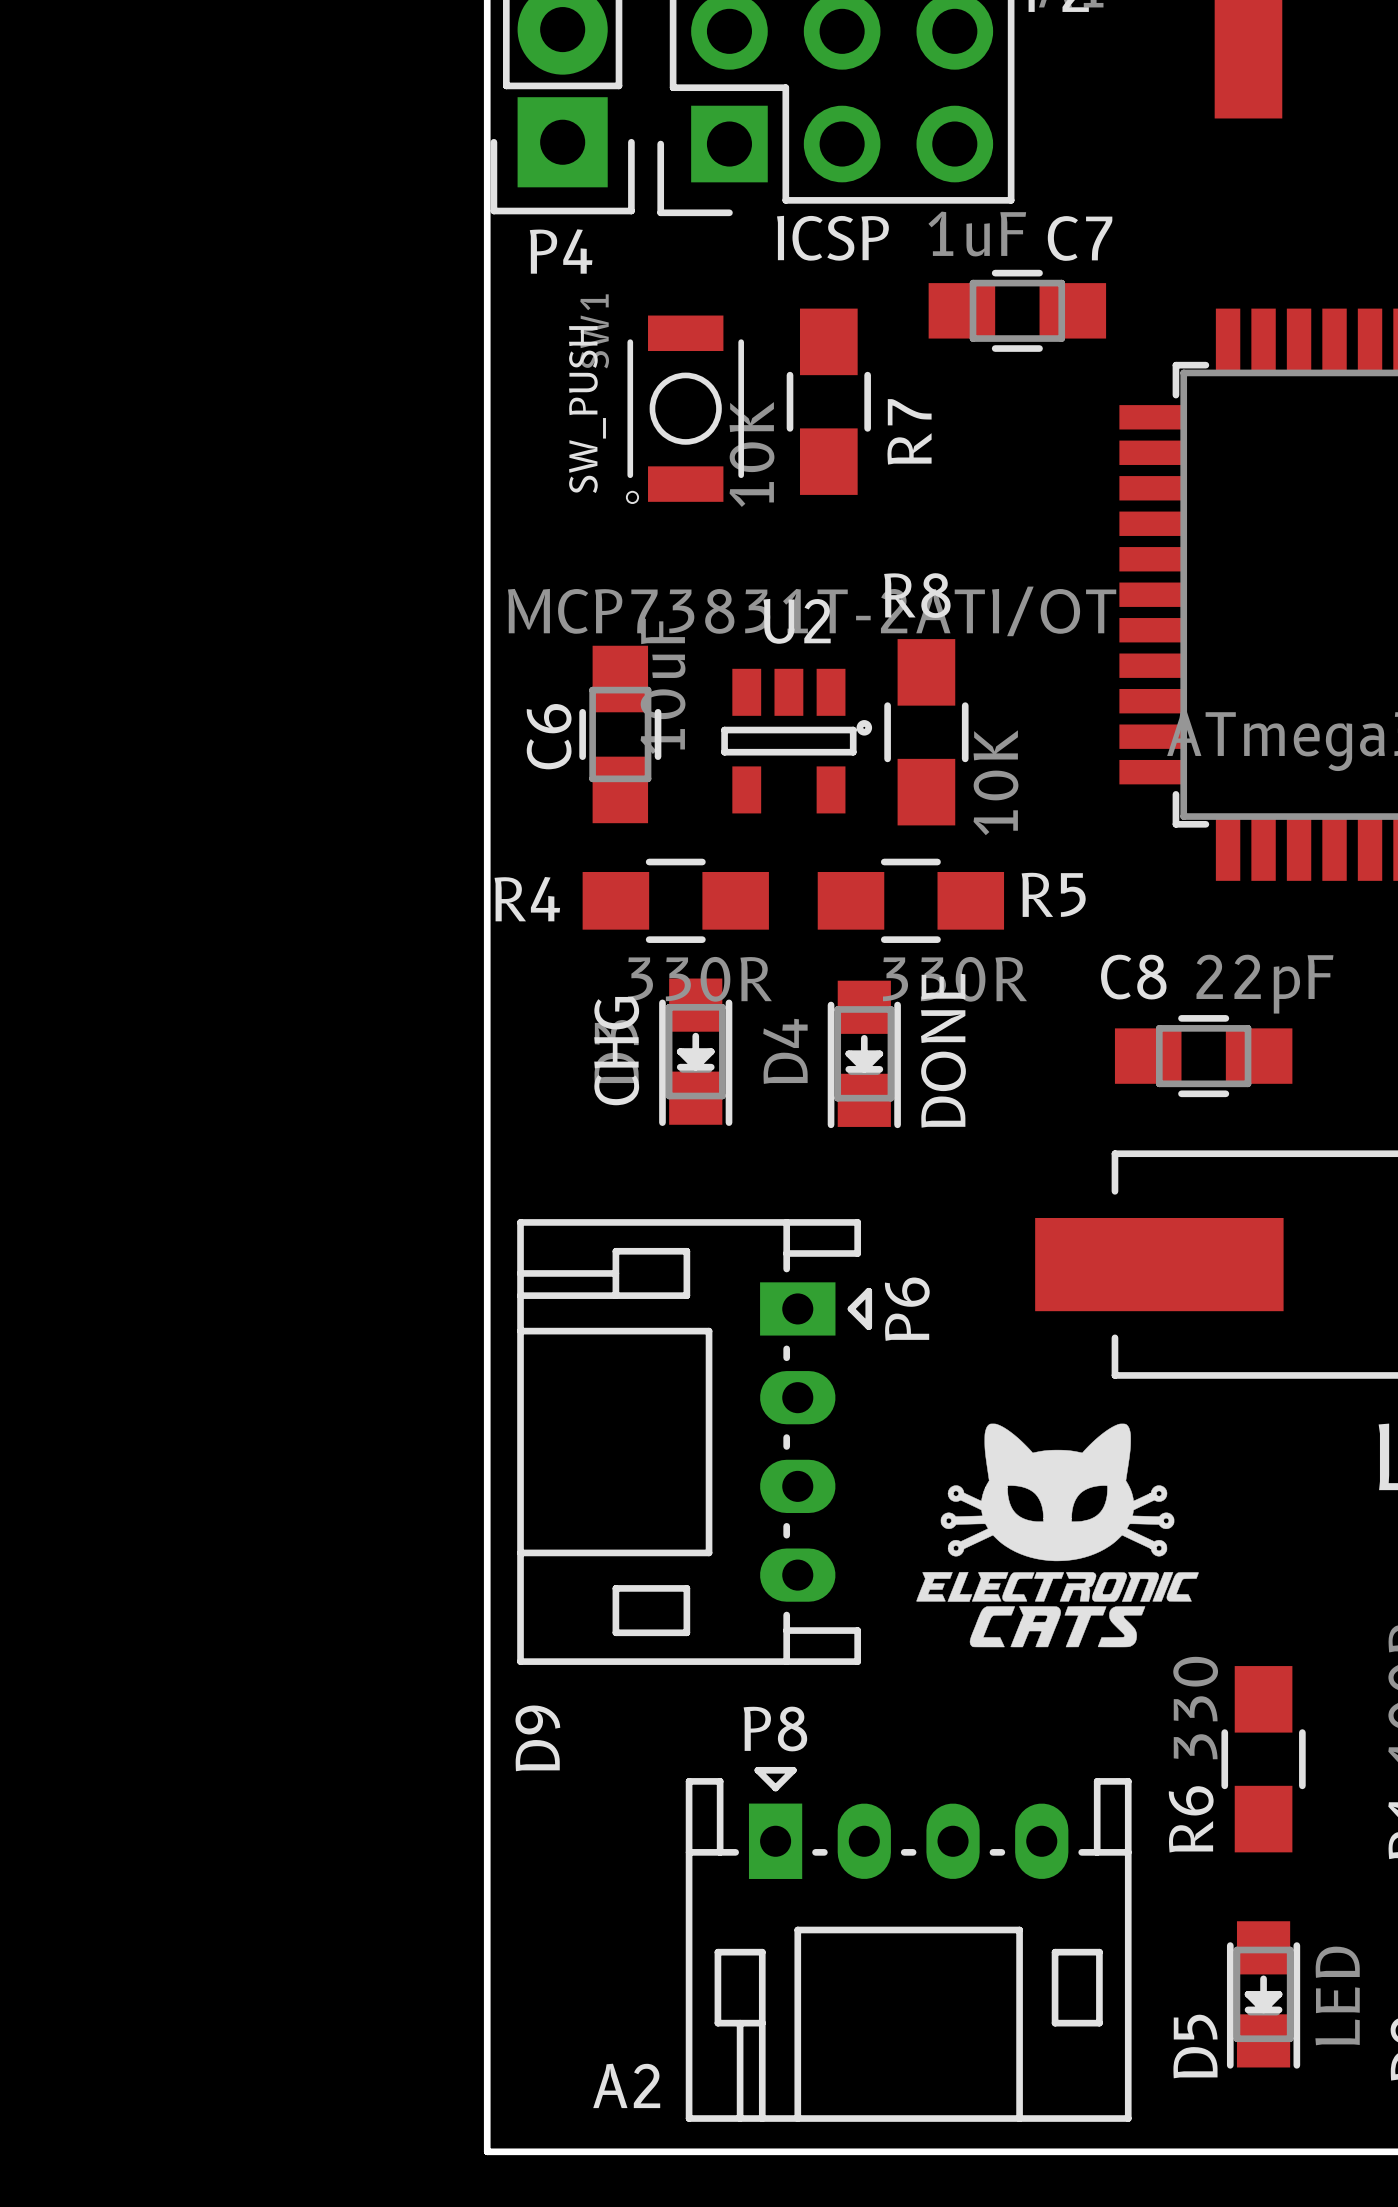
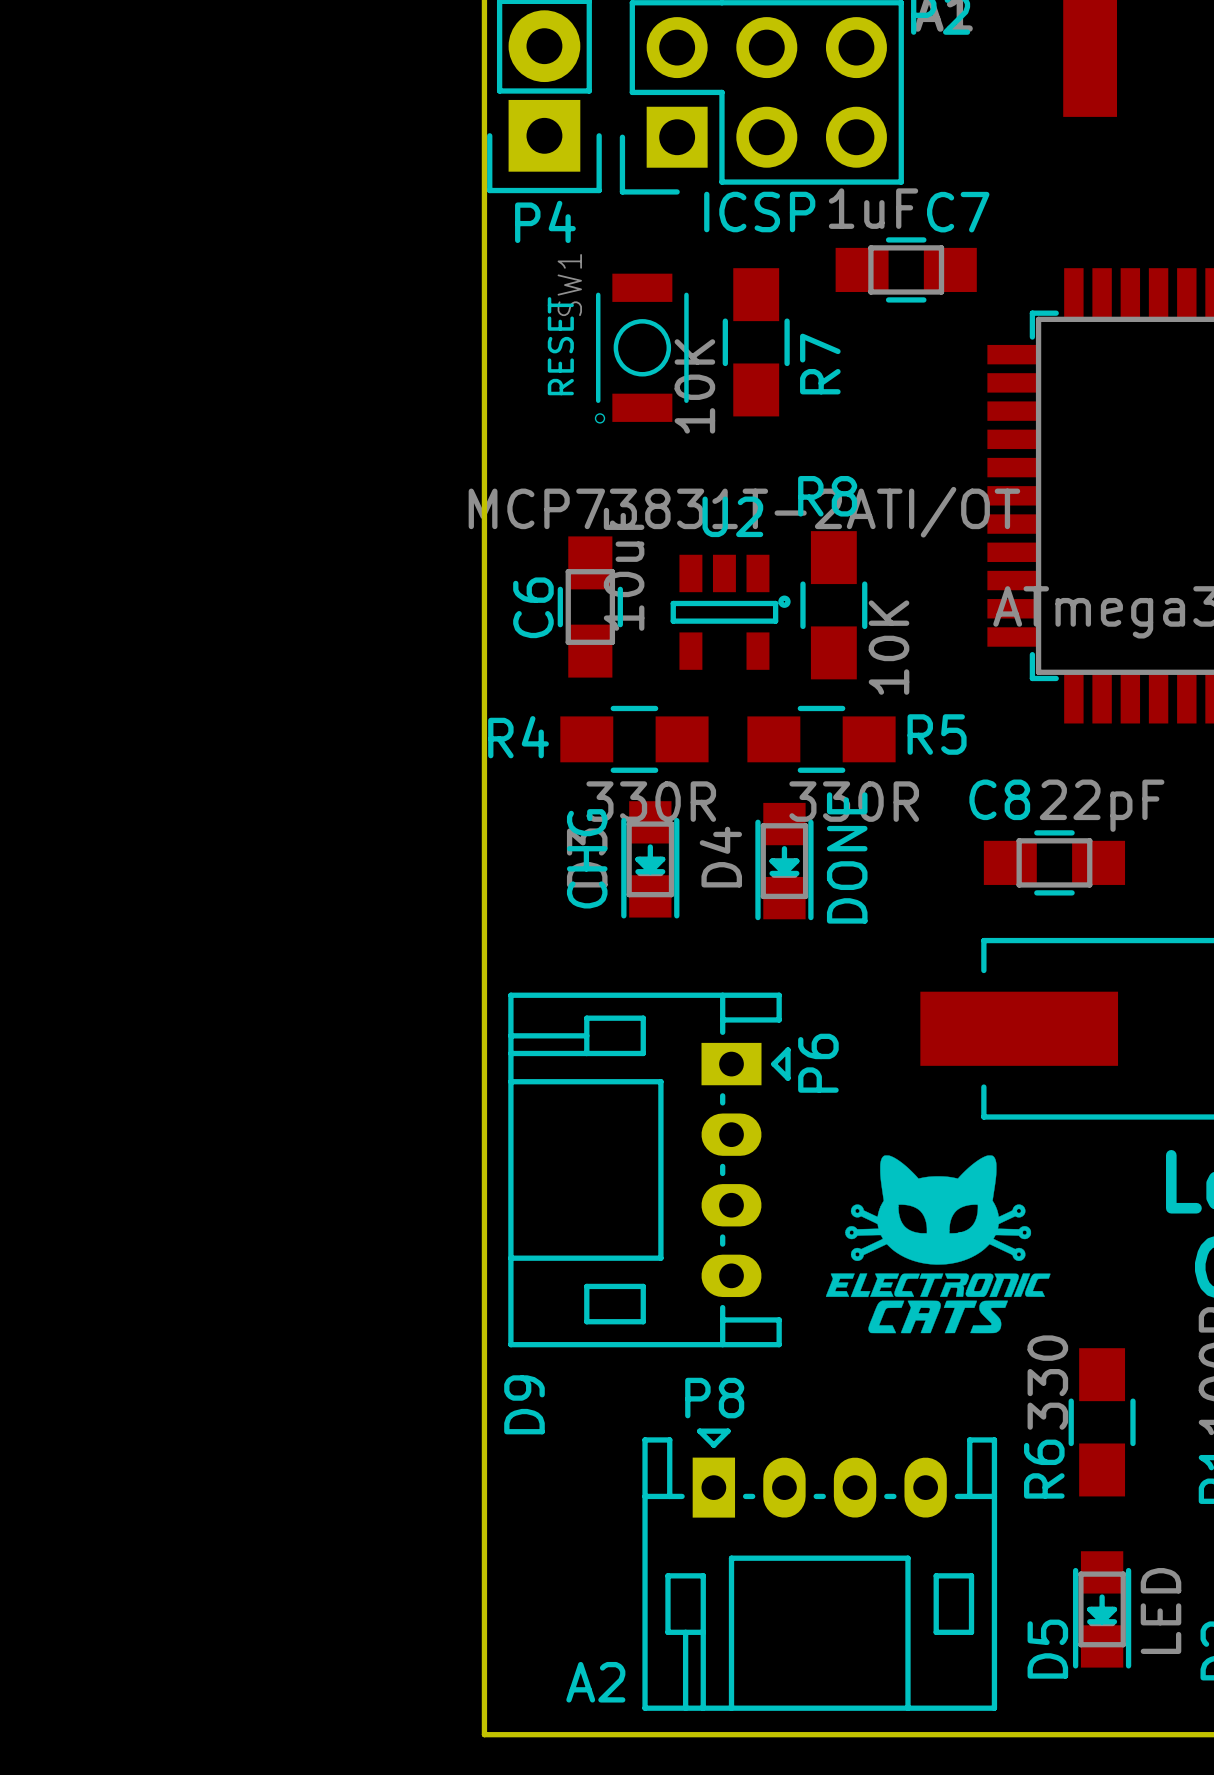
SW1 value: SW_PUSH (587, 409) -> RESET (560, 346)

